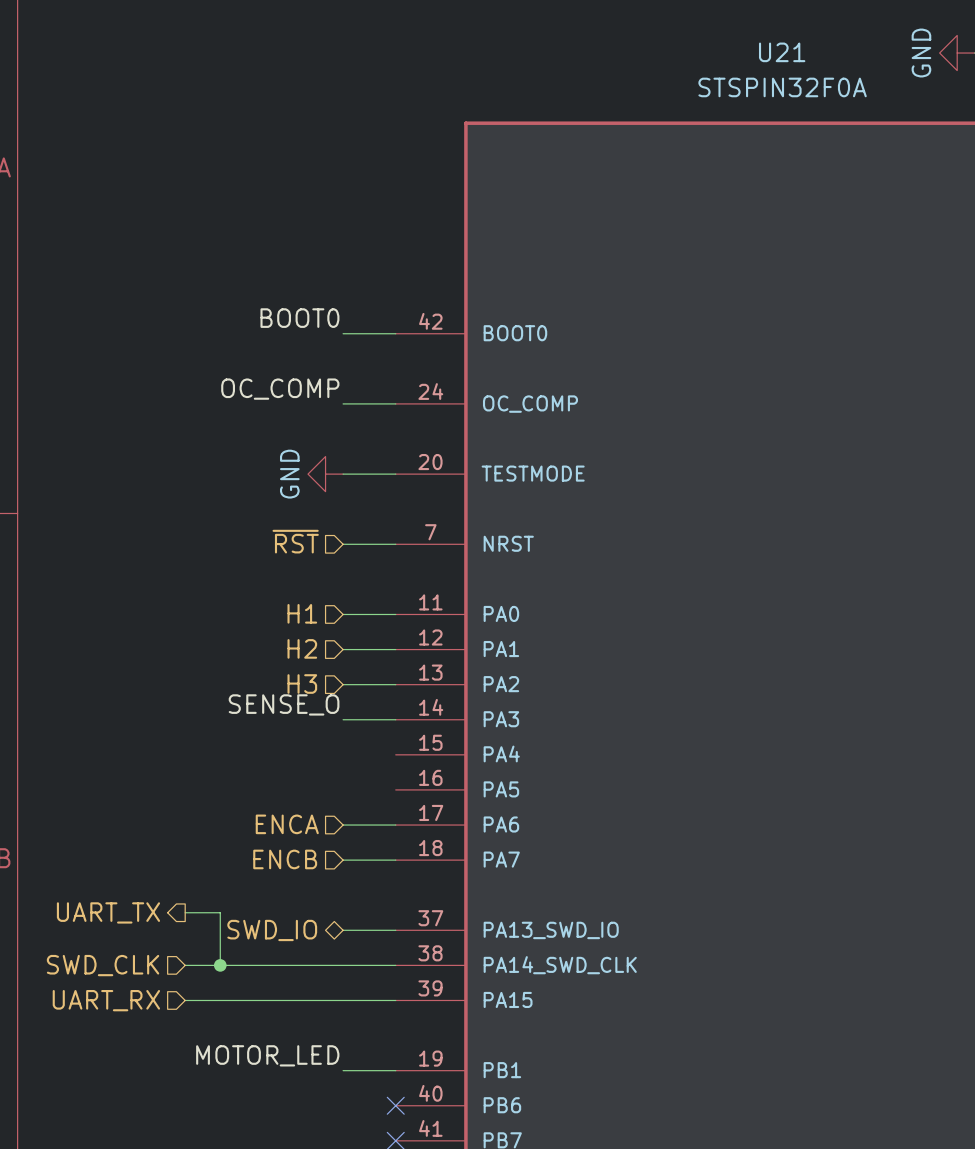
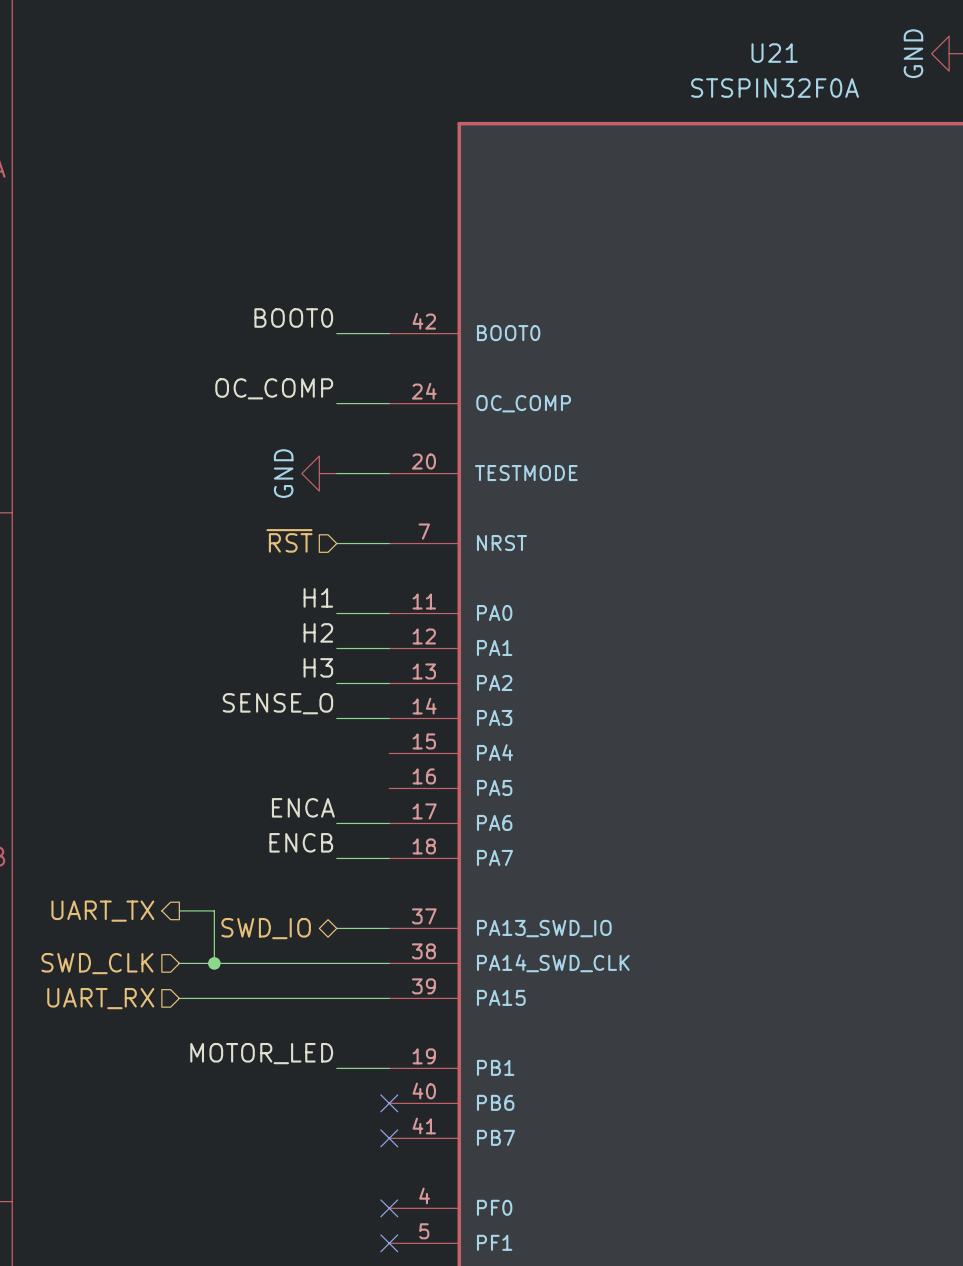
label: none -> H1 (318, 597)
hierarchical label: H1 (302, 613) -> none
label: none -> H2 (318, 632)
hierarchical label: H2 (302, 648) -> none
label: none -> H3 (318, 667)
hierarchical label: H3 (302, 684) -> none
label: none -> ENCA (303, 807)
hierarchical label: ENCA (287, 824) -> none
label: none -> ENCB (301, 842)
hierarchical label: ENCB (285, 859) -> none

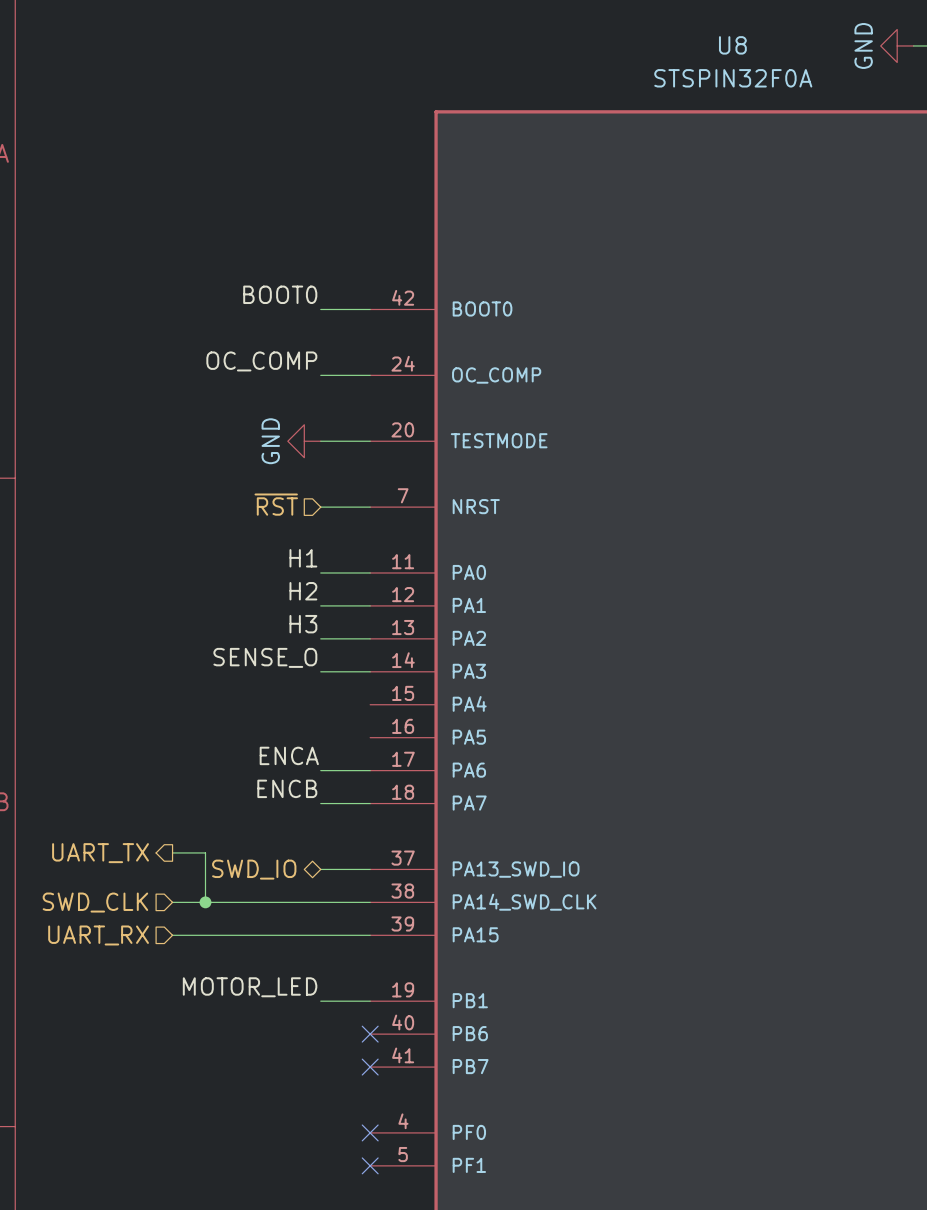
U21 name: U21 (774, 53) -> U8 (732, 45)

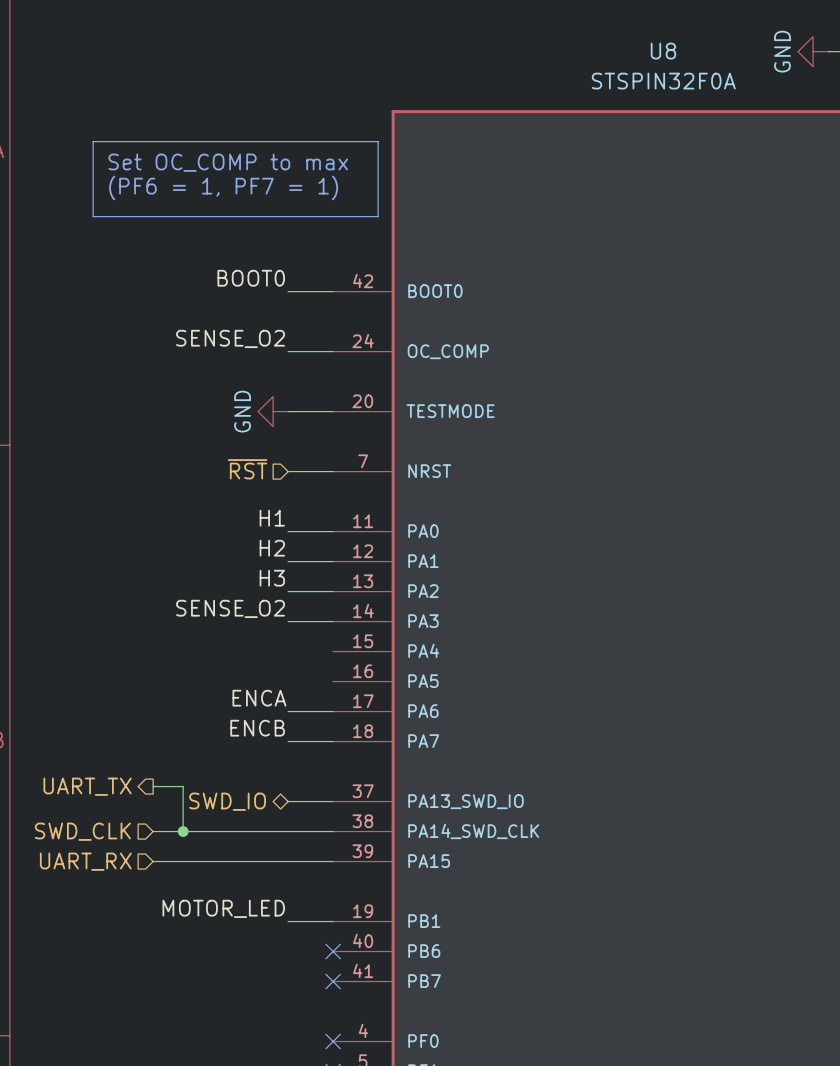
line: none -> (93, 141) (378, 141) (378, 216) (93, 216) (93, 141)
text: none -> Set OC_COMP to max (228, 162)
text: none -> (PF6 = 1, PF7 = 1) (223, 187)
label: OC_COMP (261, 361) -> SENSE_O2 (230, 338)
label: SENSE_O (265, 657) -> SENSE_O2 (230, 608)

